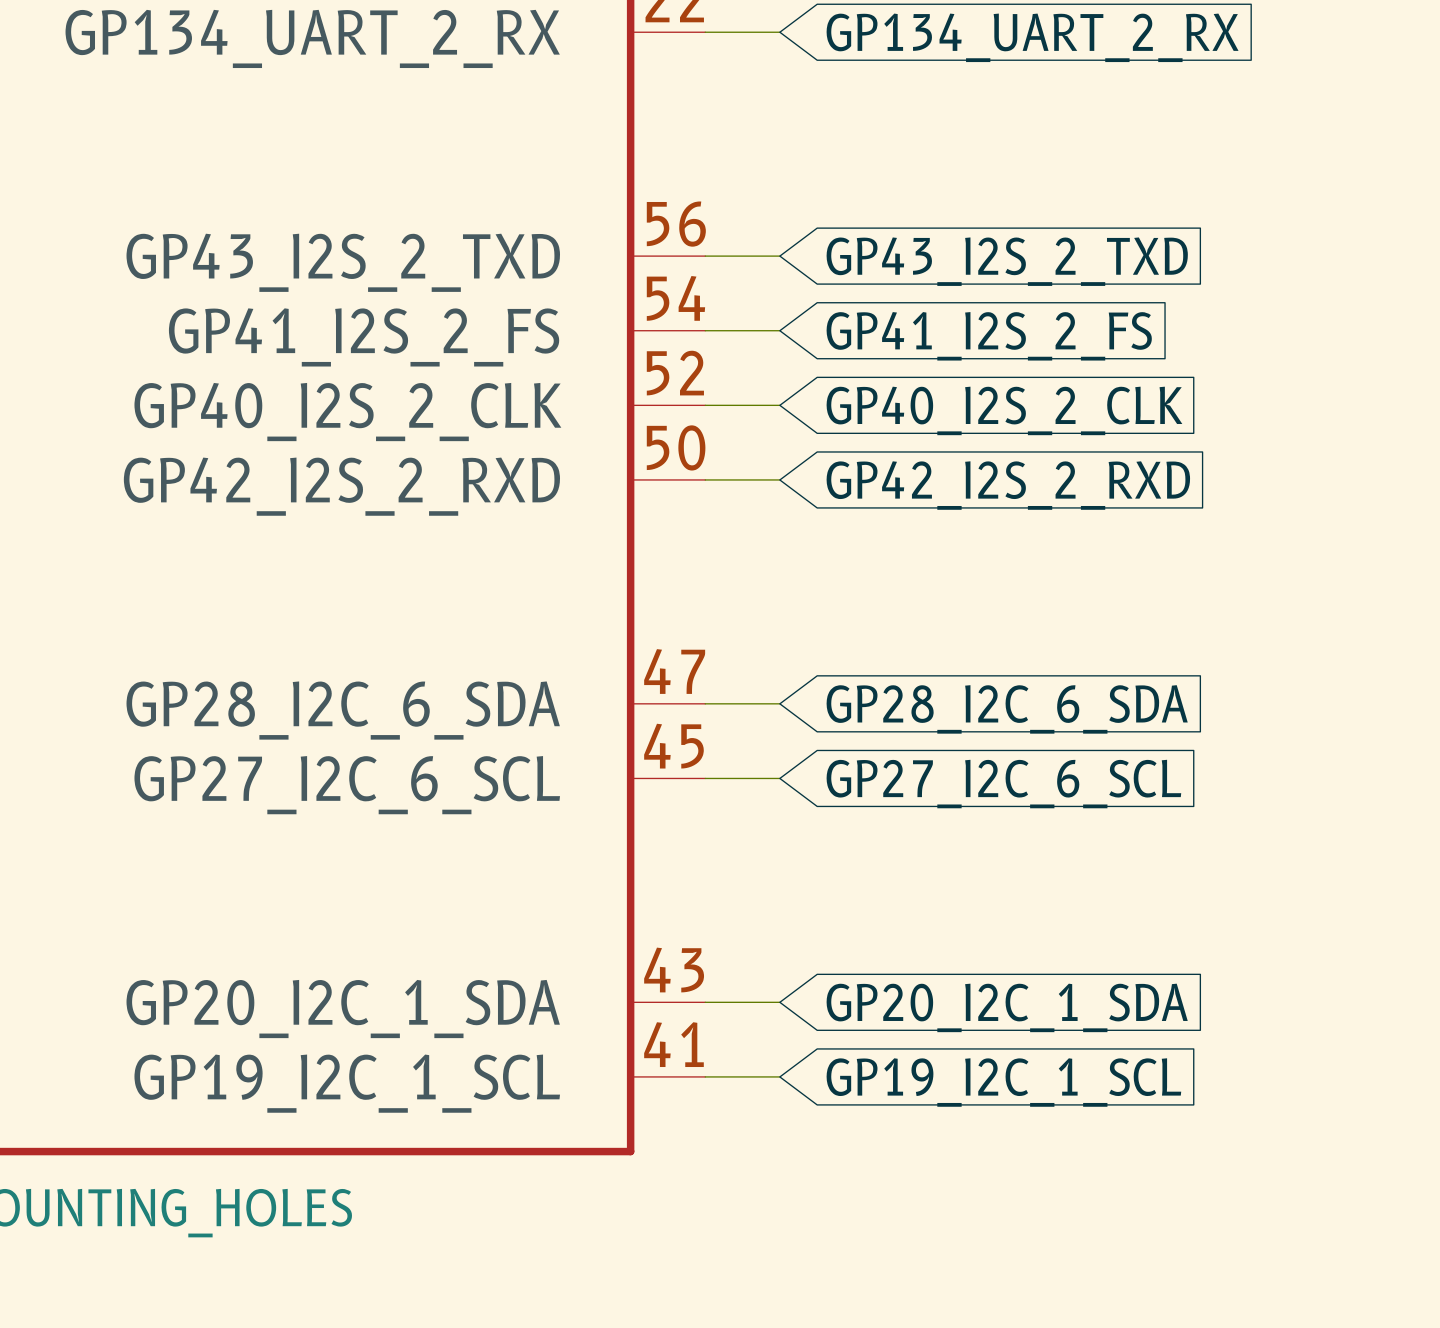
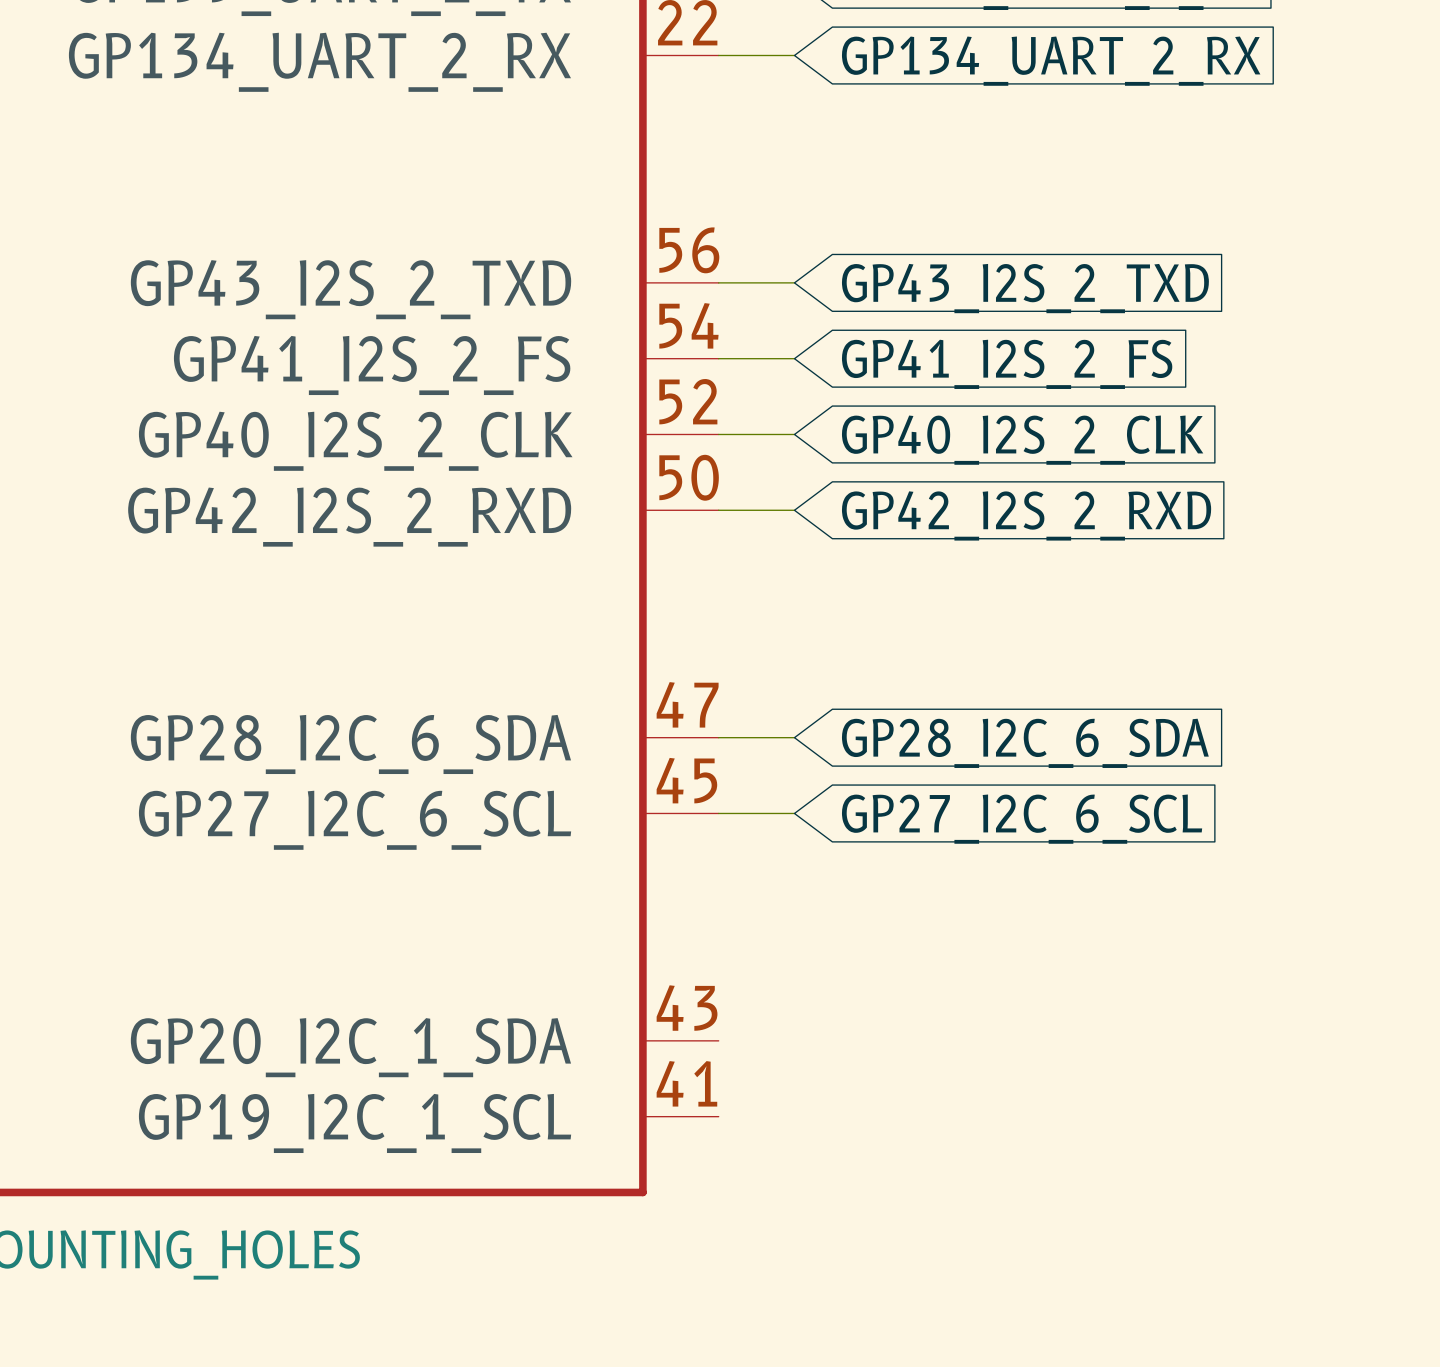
wire: (705, 1002) (779, 1002) -> none
global label: GP20_I2C_1_SDA (1007, 1007) -> none
wire: (705, 1076) (779, 1076) -> none
global label: GP19_I2C_1_SCL (1003, 1082) -> none

